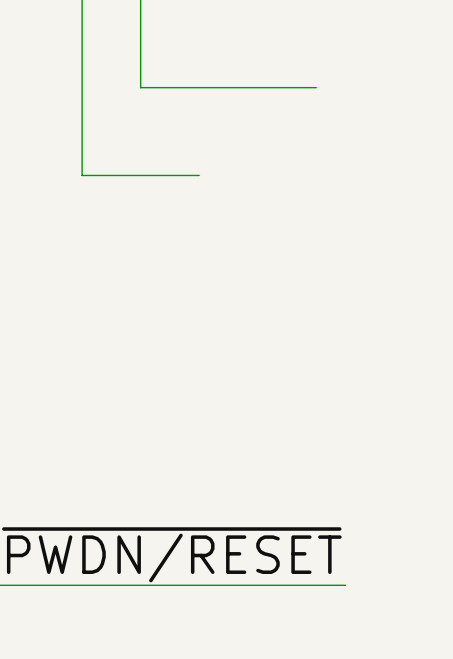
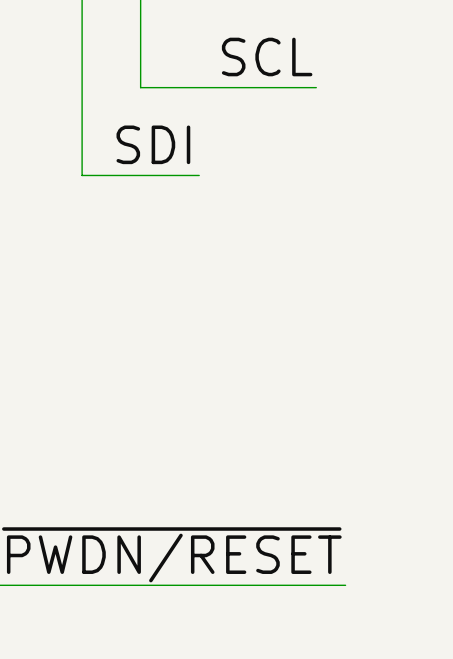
label: none -> SCL (267, 57)
label: none -> SDI (153, 144)

